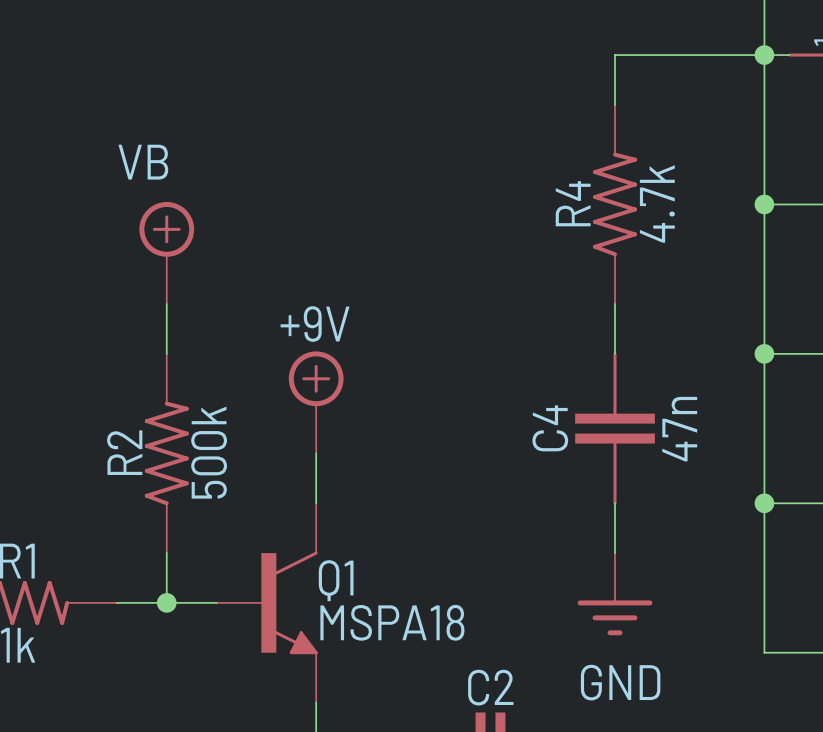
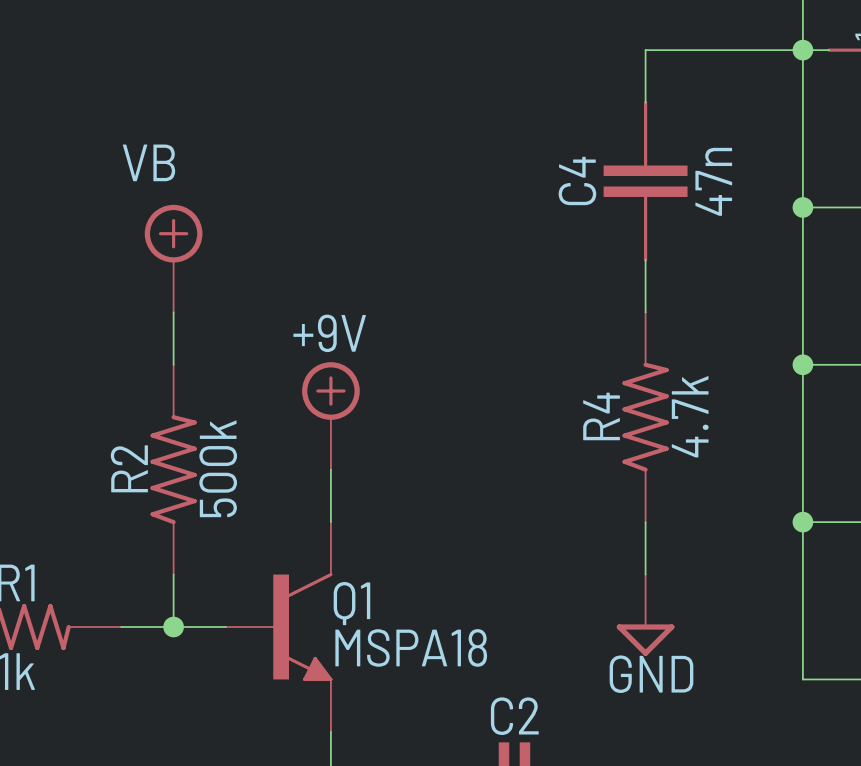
R4 position: (615, 204) -> (645, 417)
C4 position: (615, 428) -> (645, 181)
power symbol shape: [577, 553, 653, 636] -> [616, 574, 675, 656]
power symbol text position: GND (620, 682) -> GND (651, 674)

